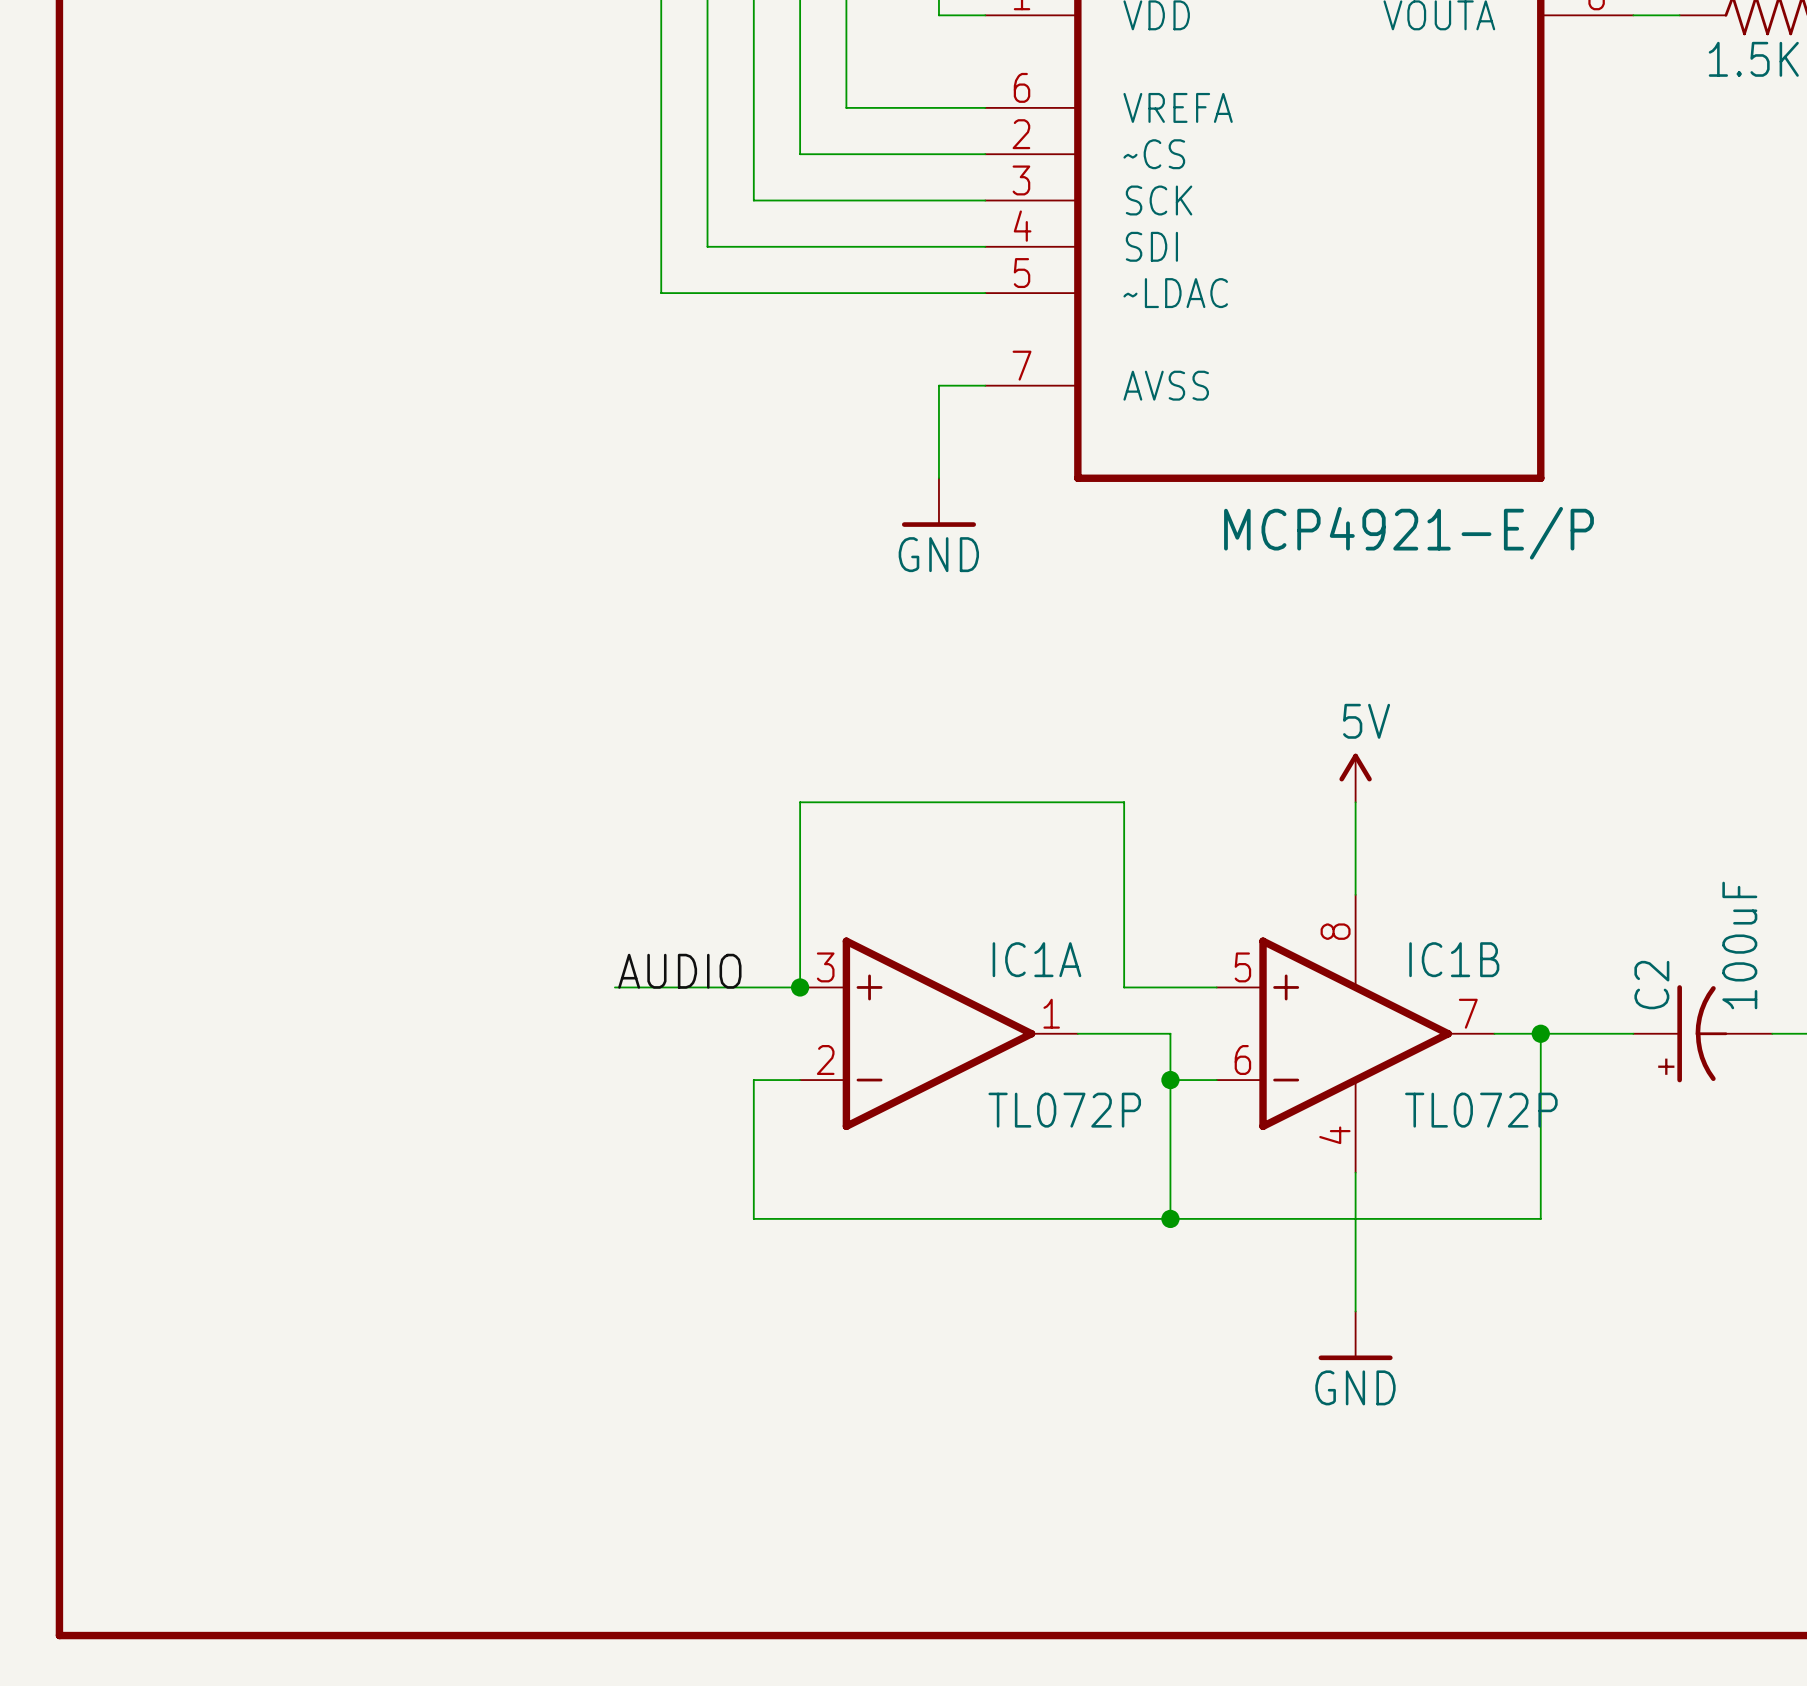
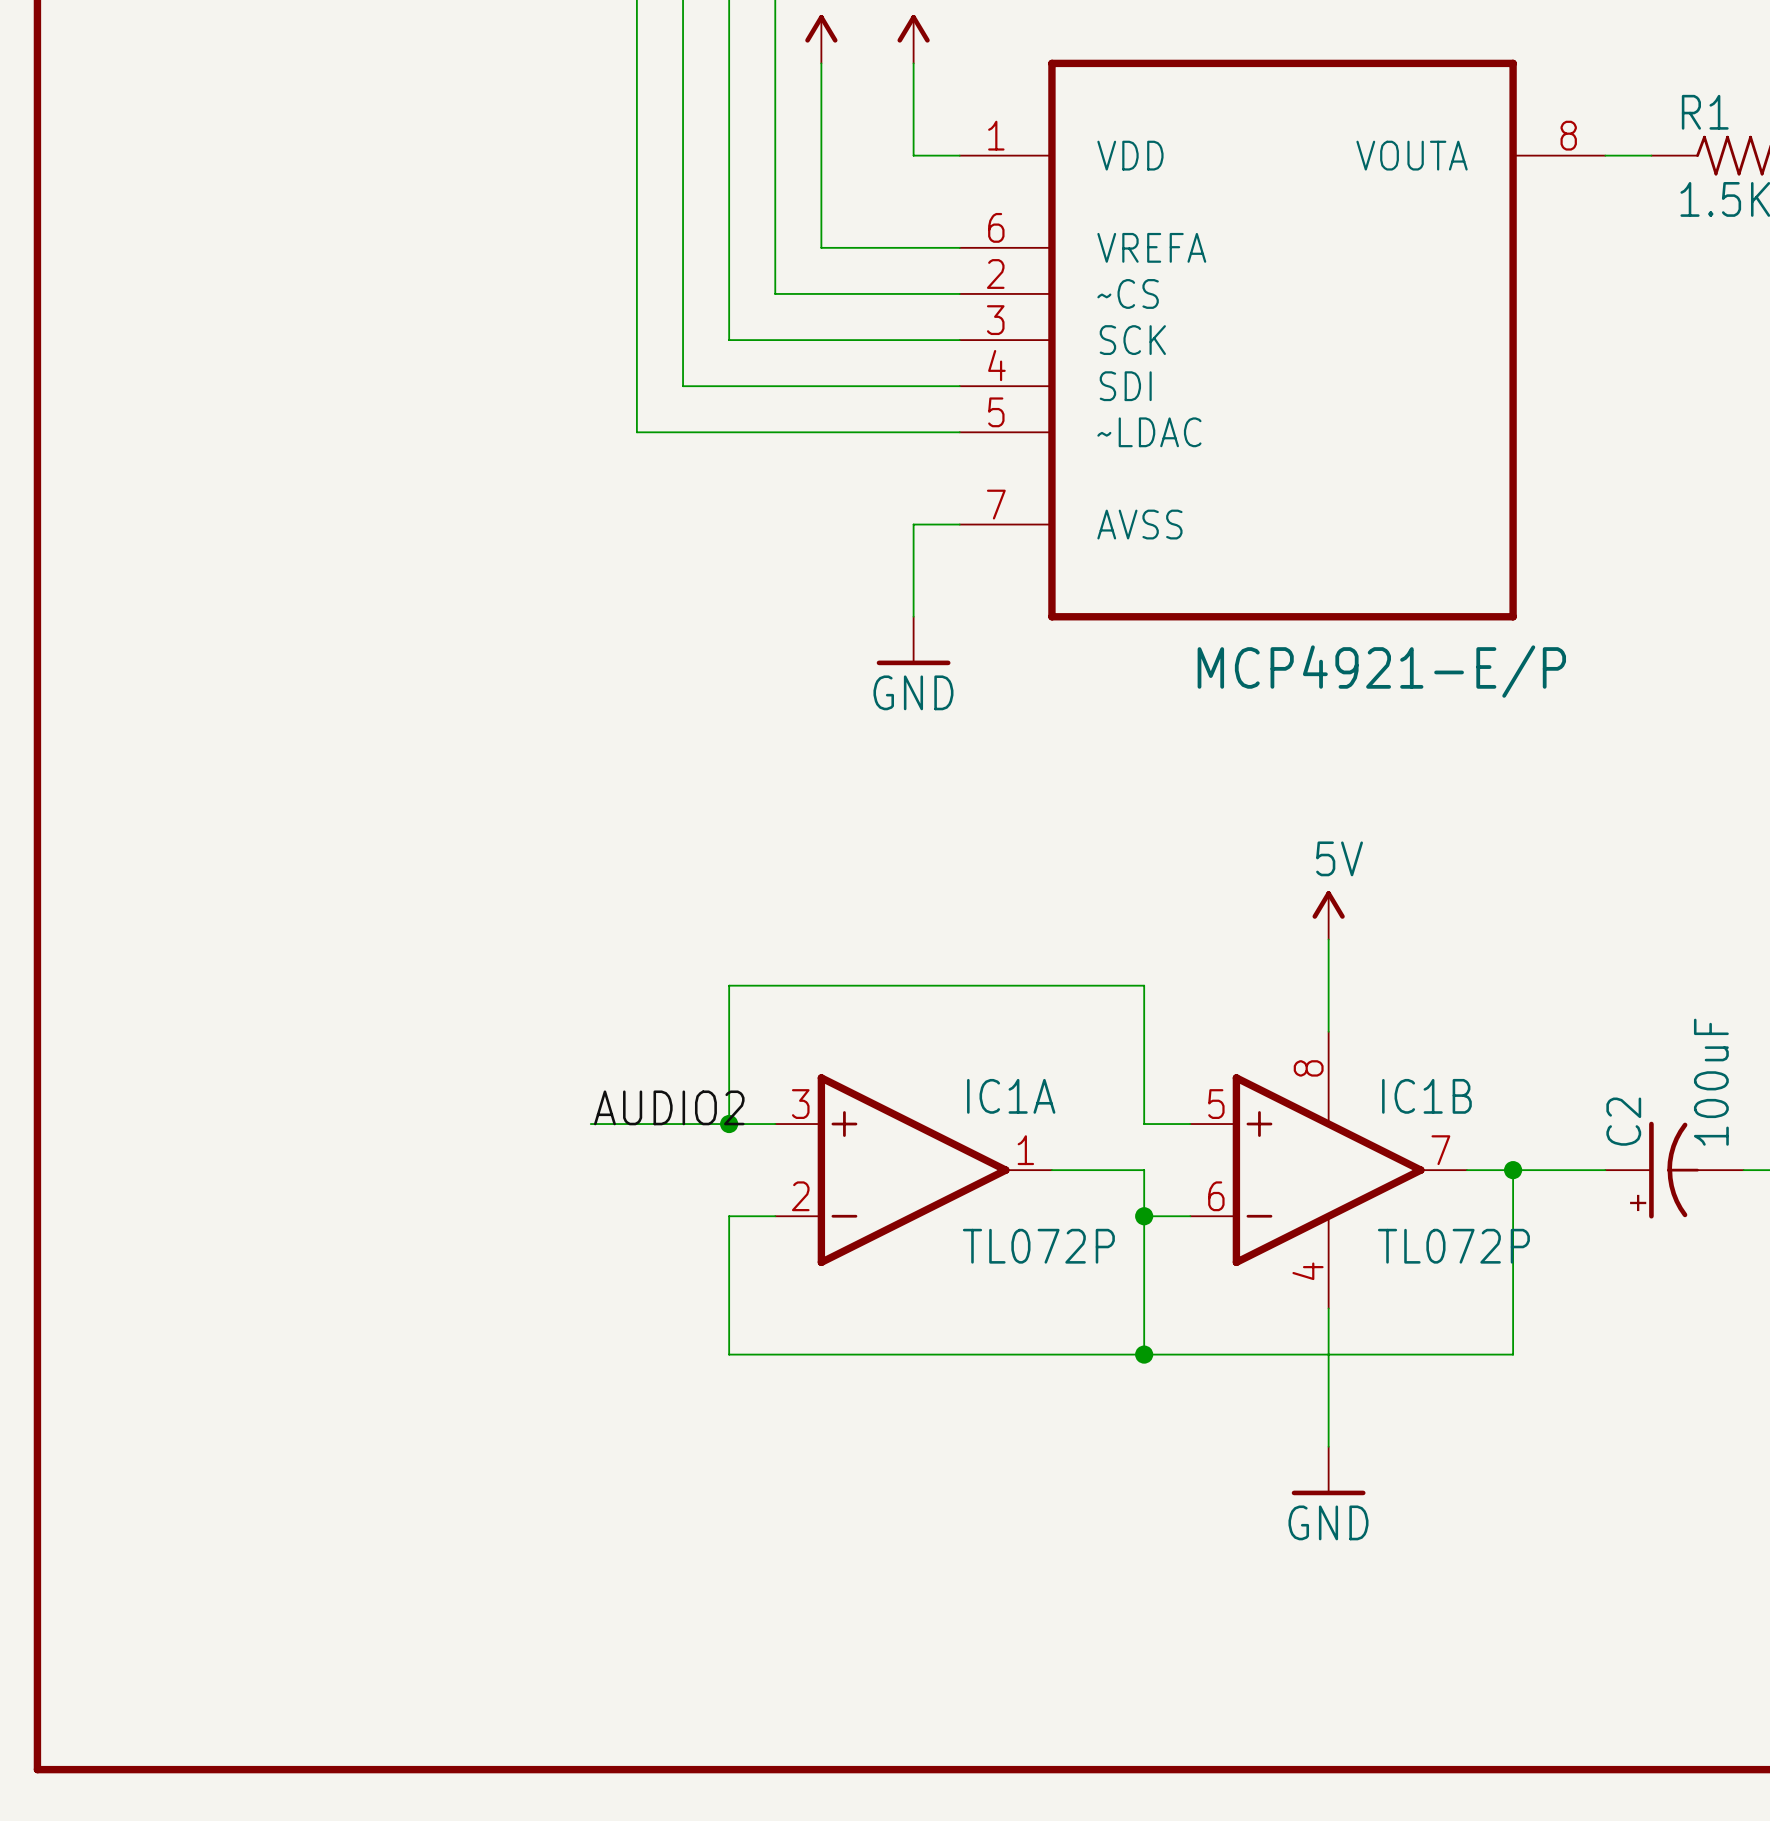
label: AUDIO (679, 971) -> AUDIO2 (669, 1107)
wire: (800, 987) (800, 802) (1124, 802) (1124, 987) (1170, 987) -> (729, 1124) (729, 985) (1144, 985) (1144, 1124)
junction position: (800, 987) -> (729, 1124)

